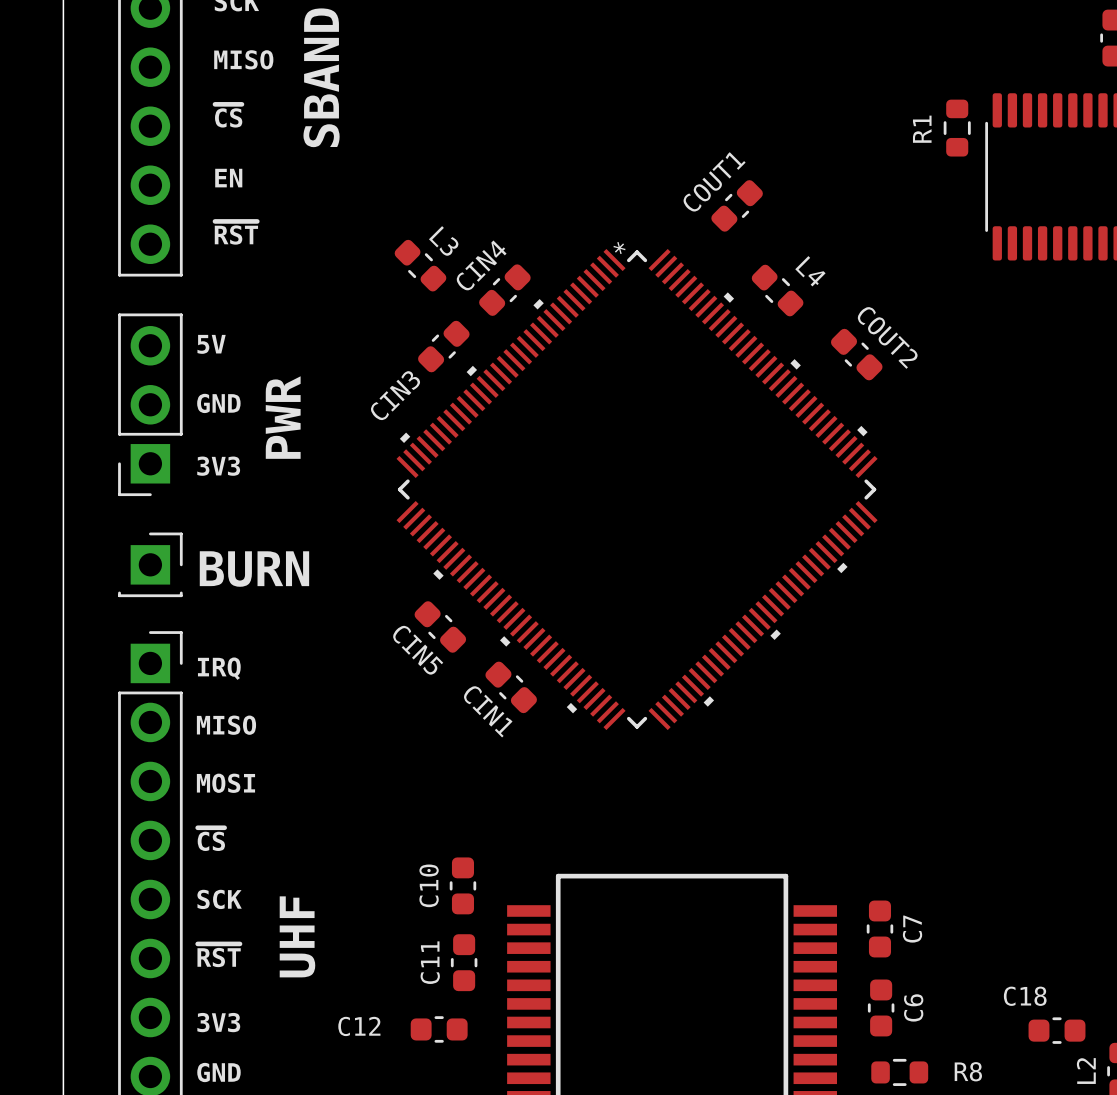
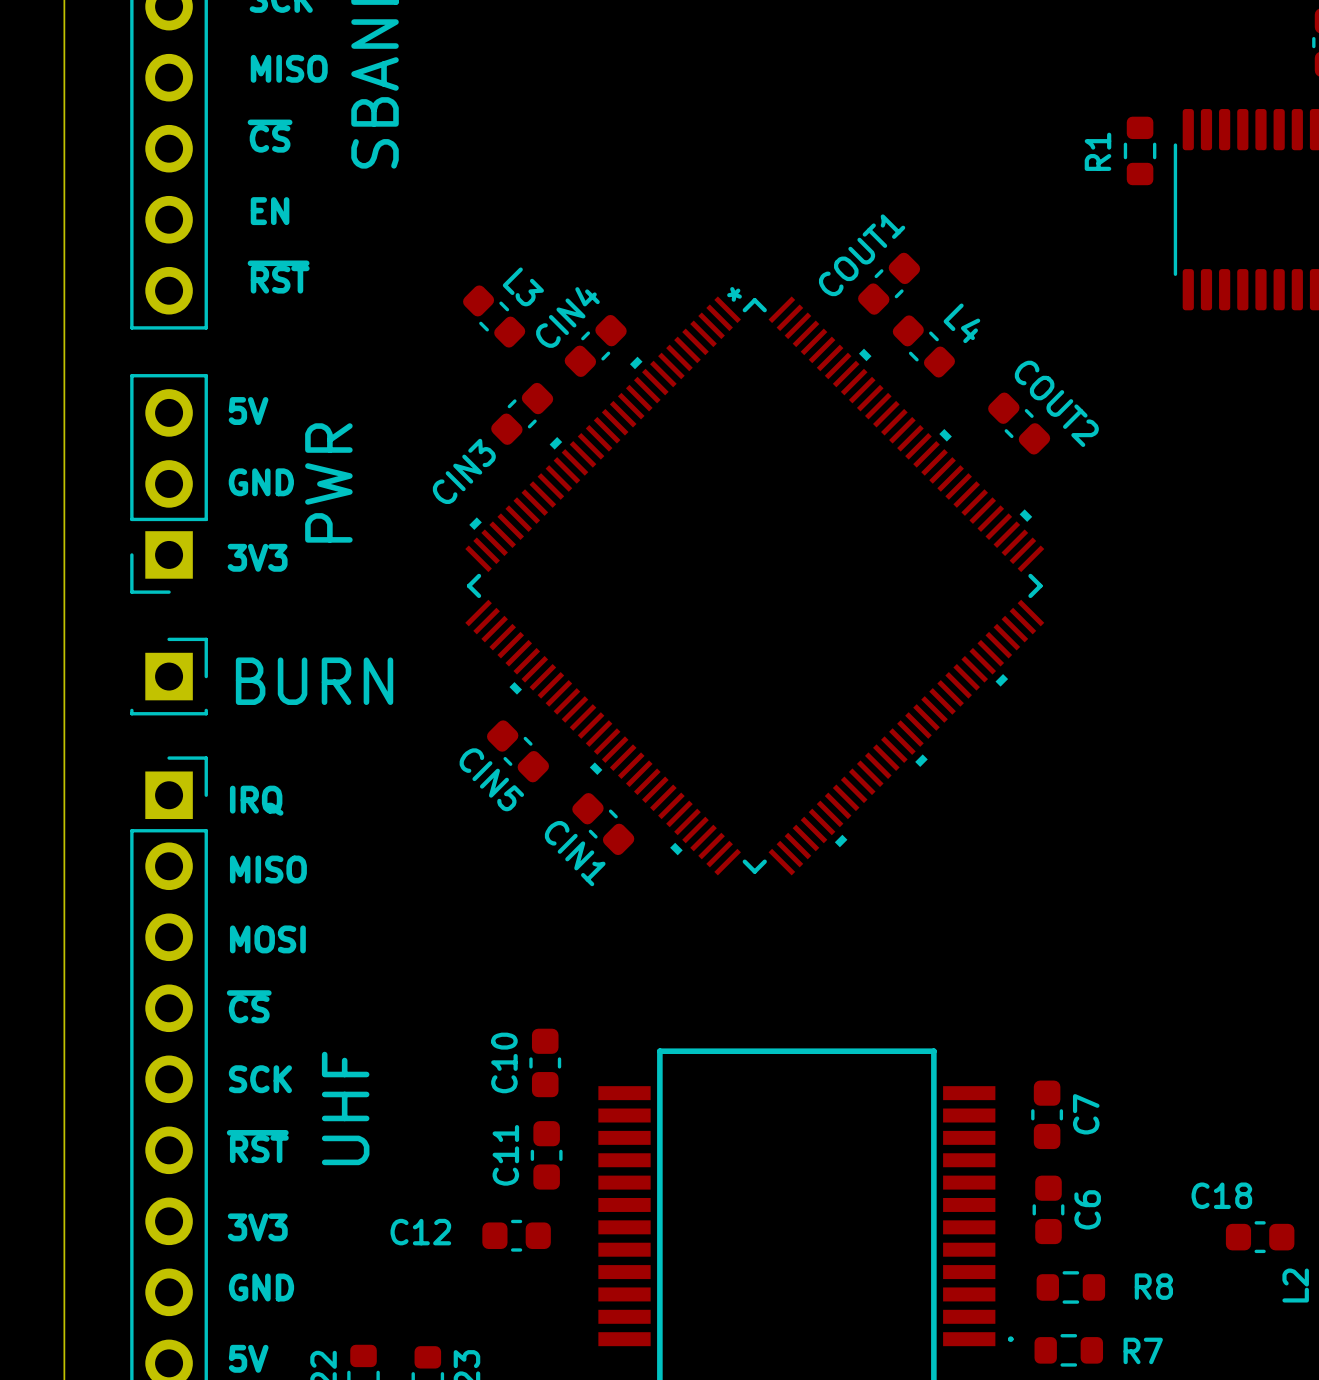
COUT1 position: (737, 205) -> (889, 283)

